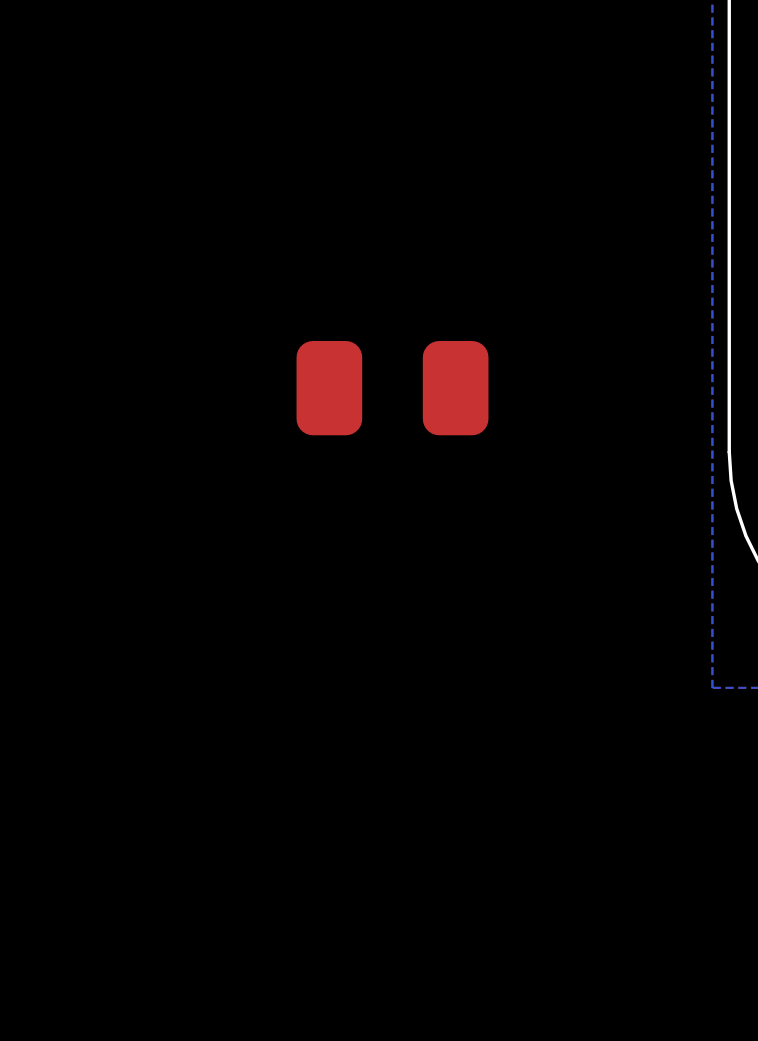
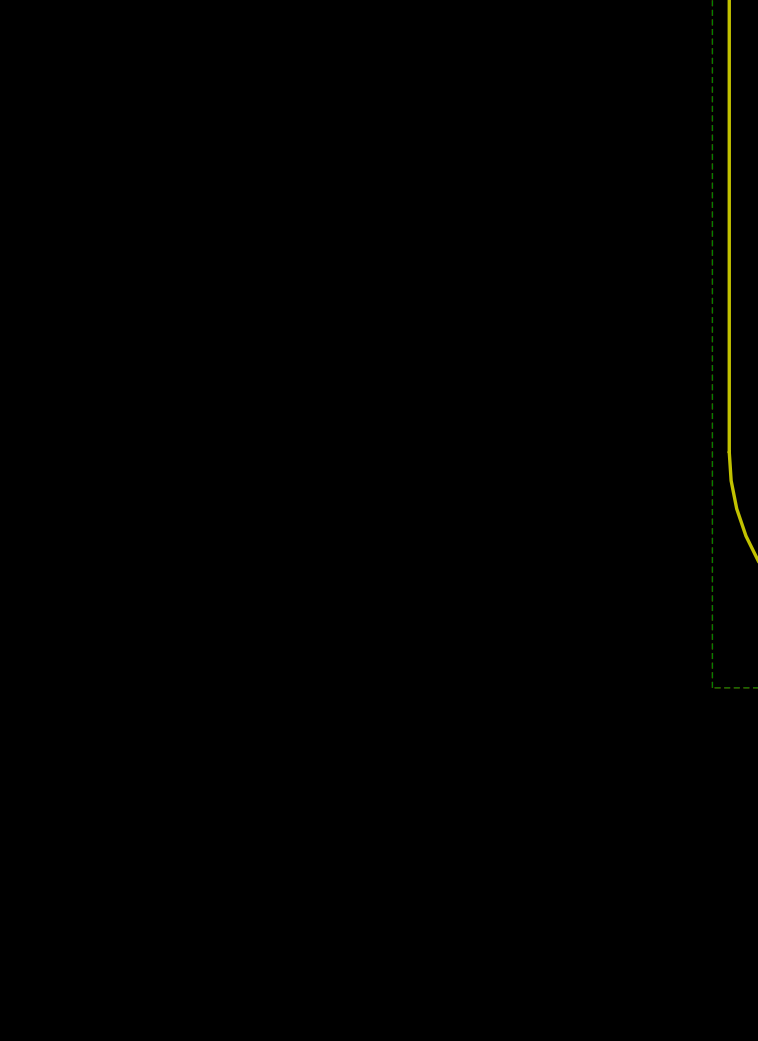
part: (392, 388) -> none

